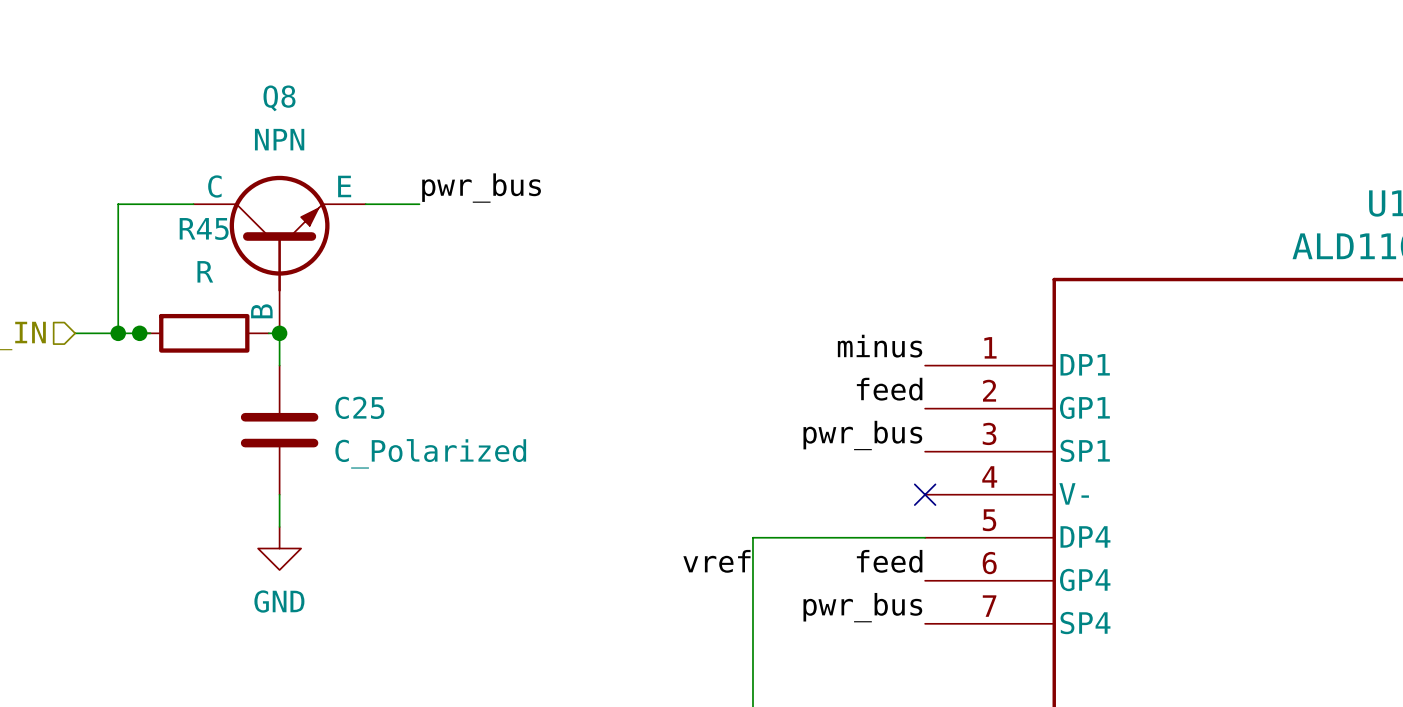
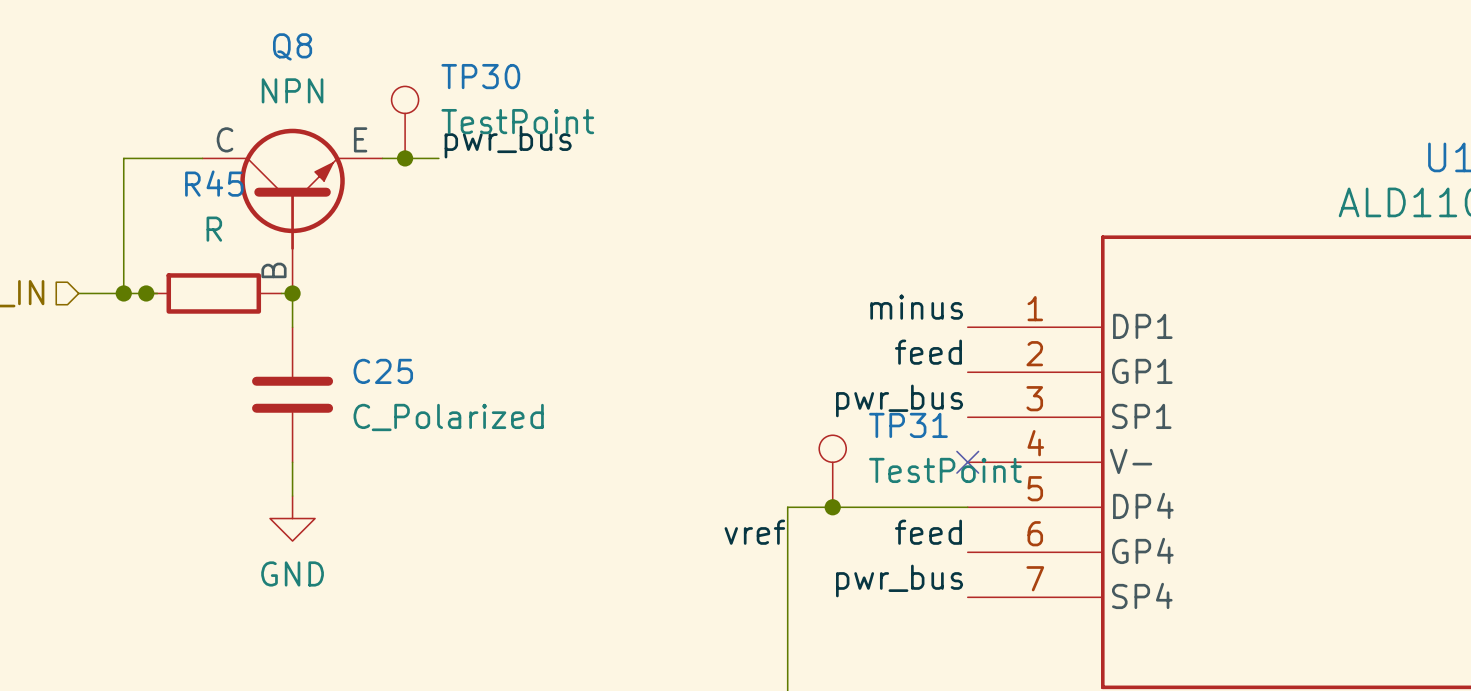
TP30: none -> TestPoint (405, 122)
junction: none -> (405, 158)
TP31: none -> TestPoint (832, 471)
junction: none -> (832, 507)

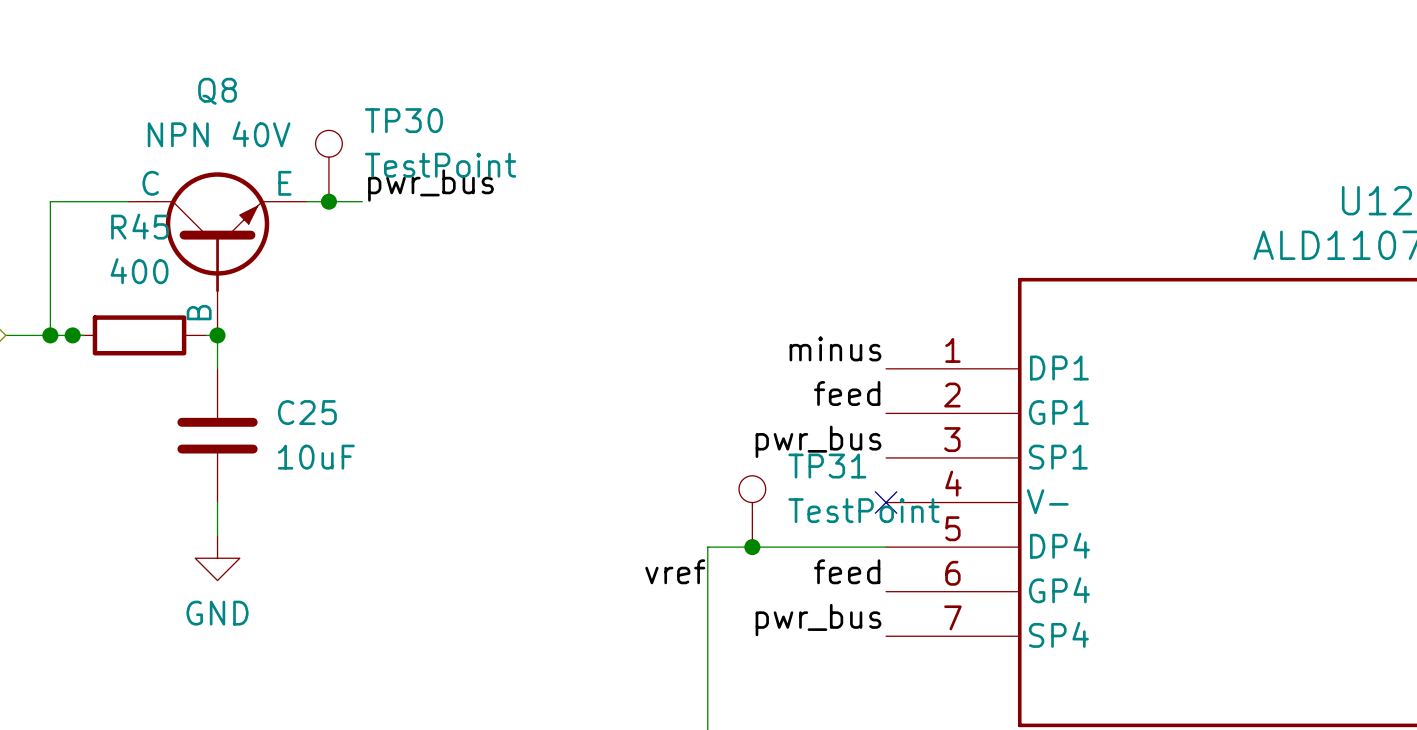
Q8 value: NPN (292, 90) -> NPN 40V (219, 134)
R45 value: R (214, 229) -> 400 (139, 271)
C25 value: C_Polarized (448, 417) -> 10uF (316, 457)

